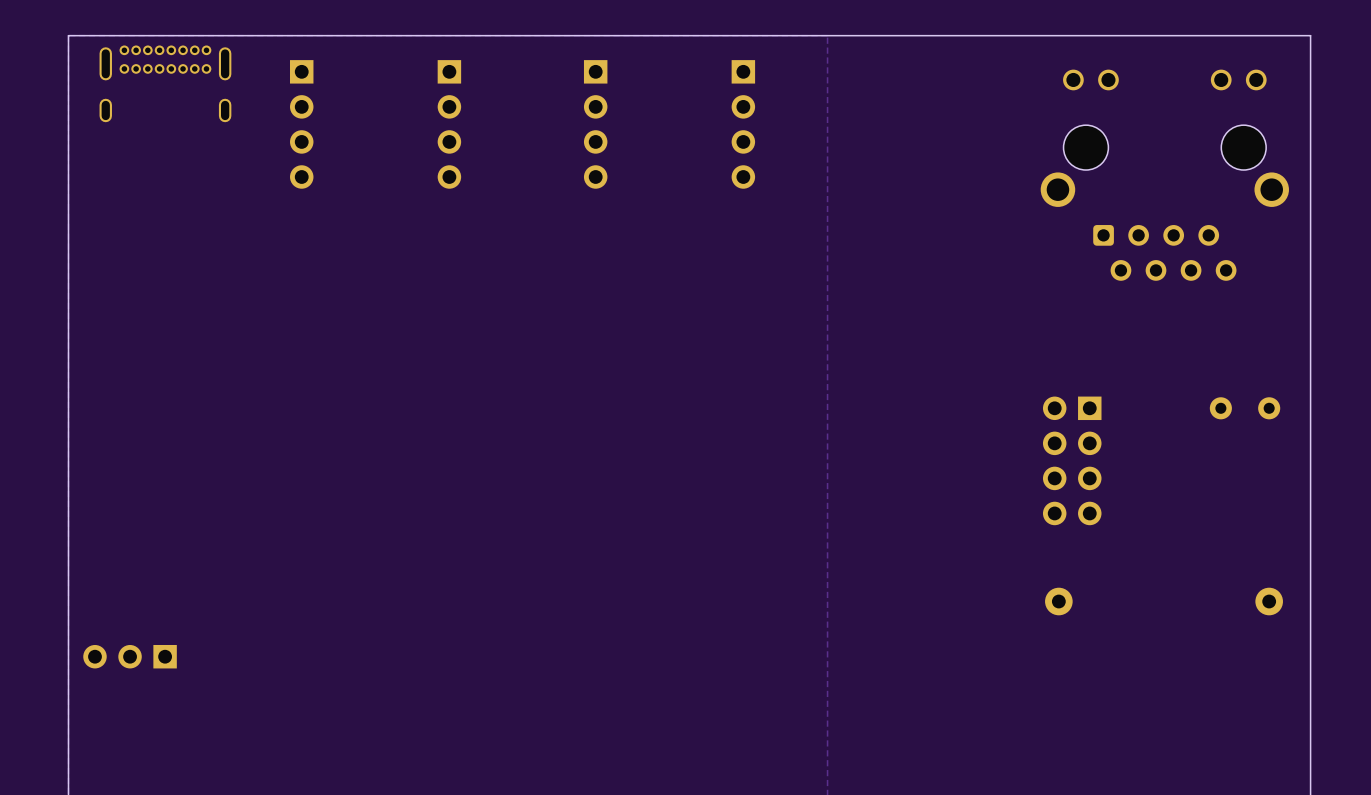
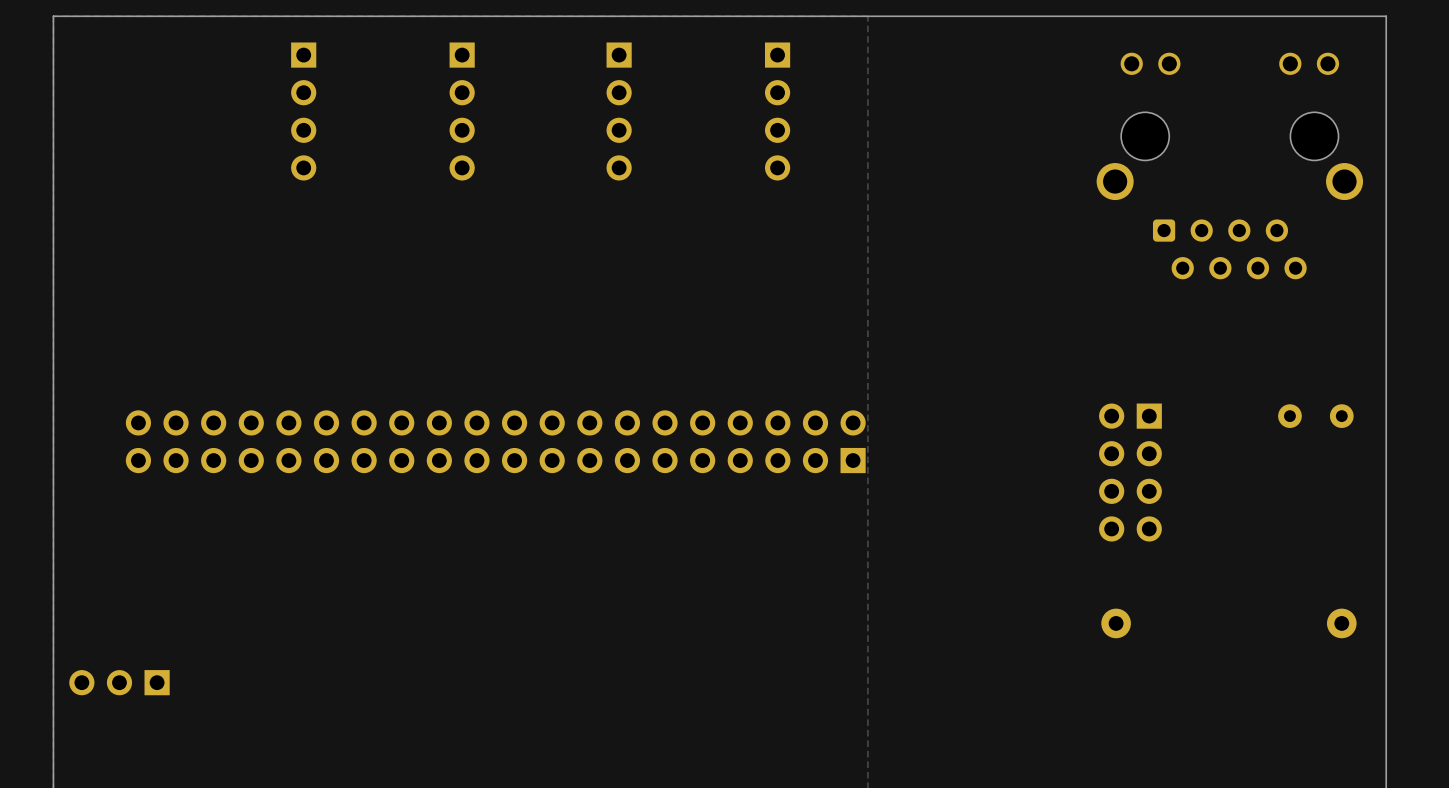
part: (165, 83) -> none
part: none -> (495, 441)

